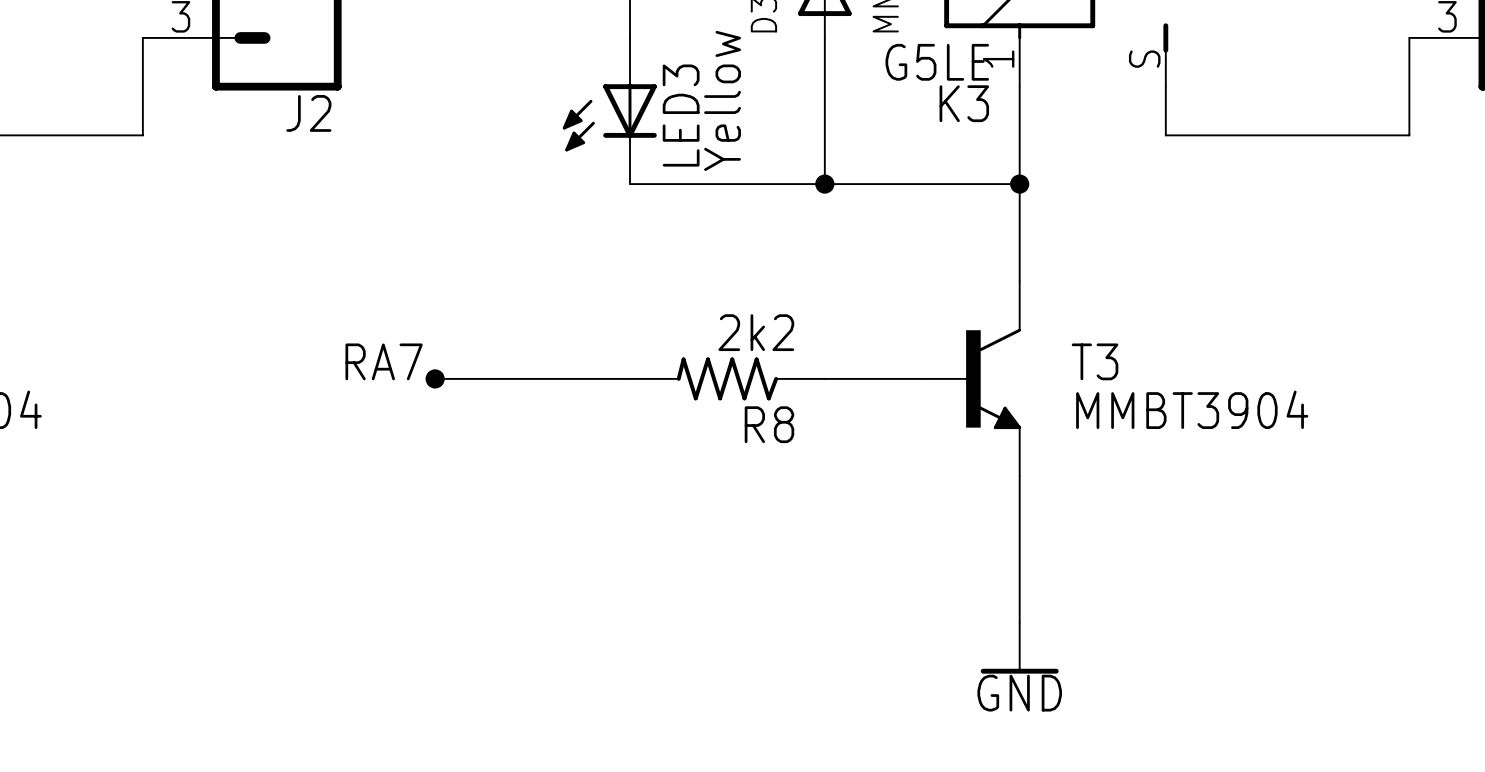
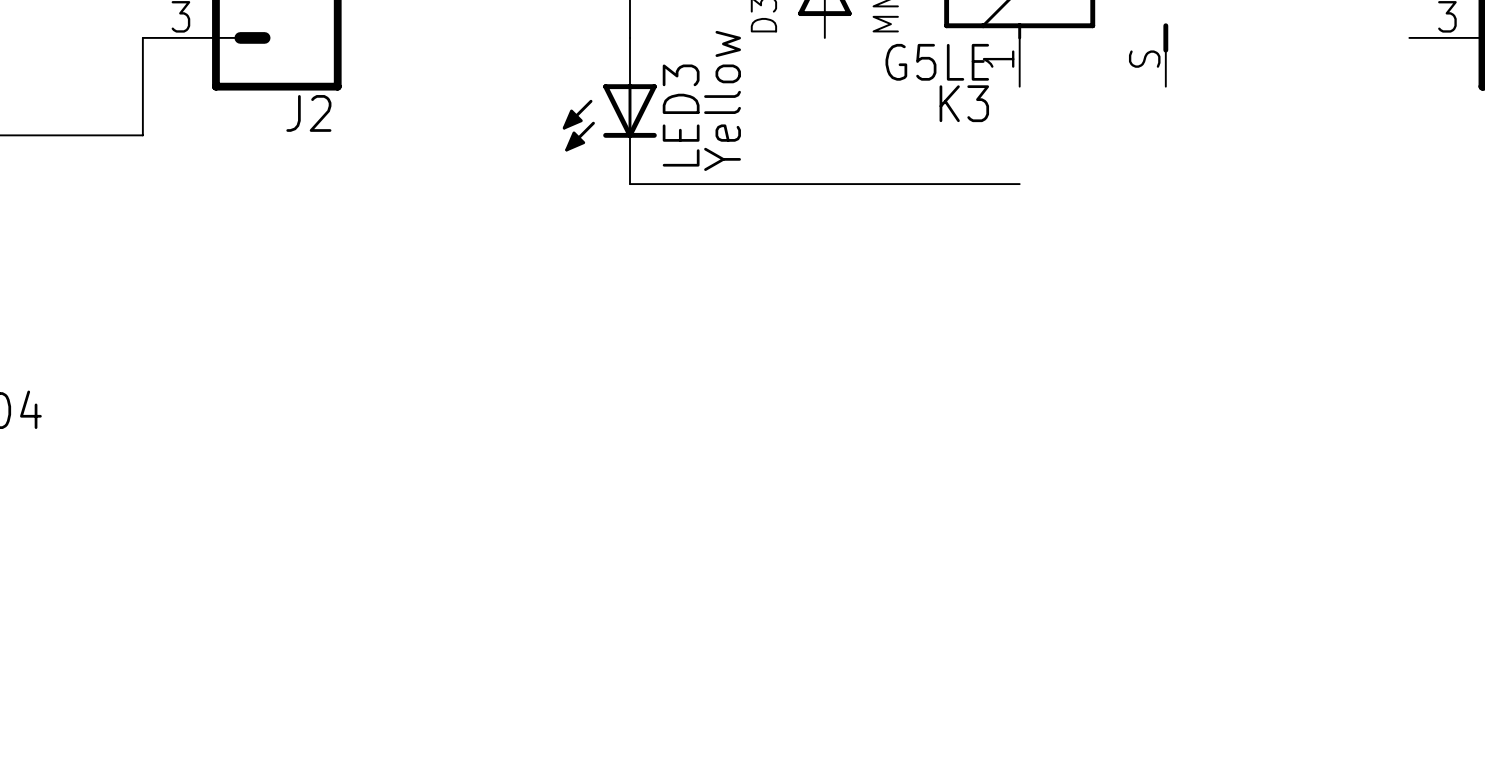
wire: (824, 37) (824, 184) -> none
wire: (1409, 37) (1409, 135) (1165, 135) (1165, 86) -> none
wire: (1019, 86) (1019, 281) -> none
junction: (824, 184) -> none
junction: (1019, 184) -> none
label: RA7 (384, 361) -> none
wire: (435, 378) (629, 378) -> none
junction: (435, 378) -> none
R8: 2k2 (727, 378) -> none
wire: (824, 378) (922, 378) -> none
T3: MMBT3904 (971, 378) -> none
wire: (1019, 476) (1019, 622) -> none
power symbol: GND (1019, 648) -> none

